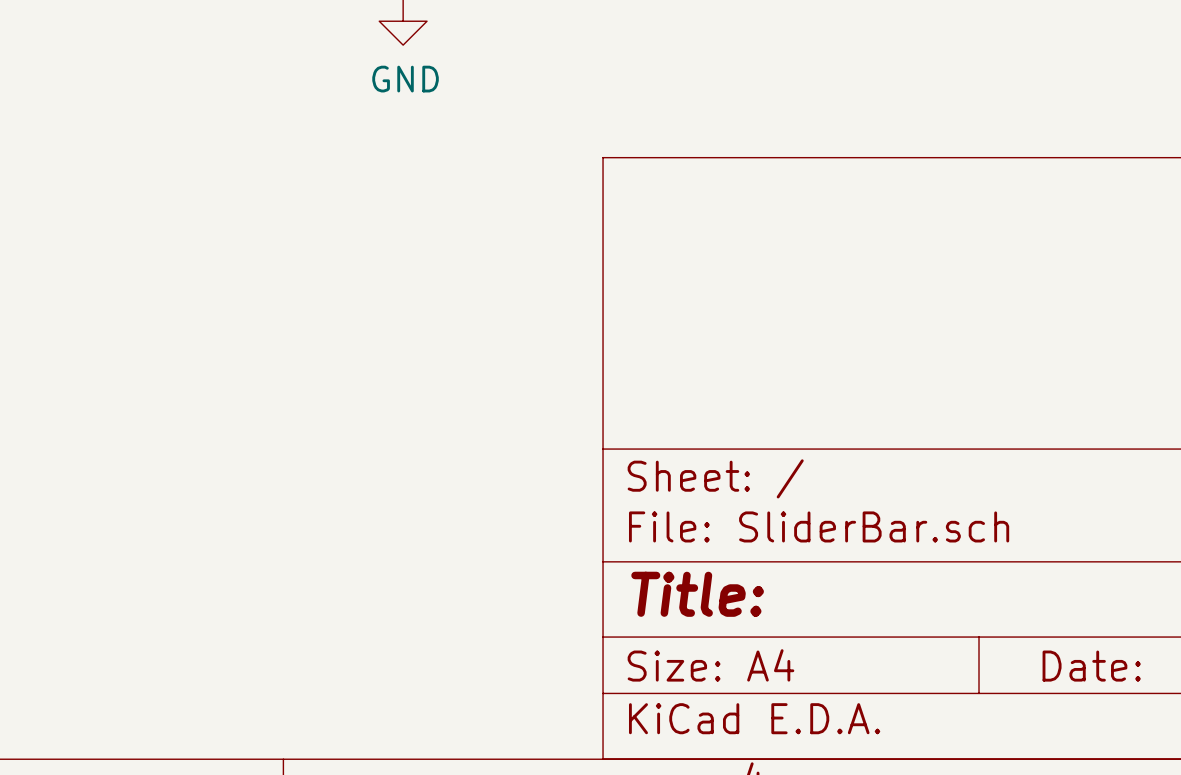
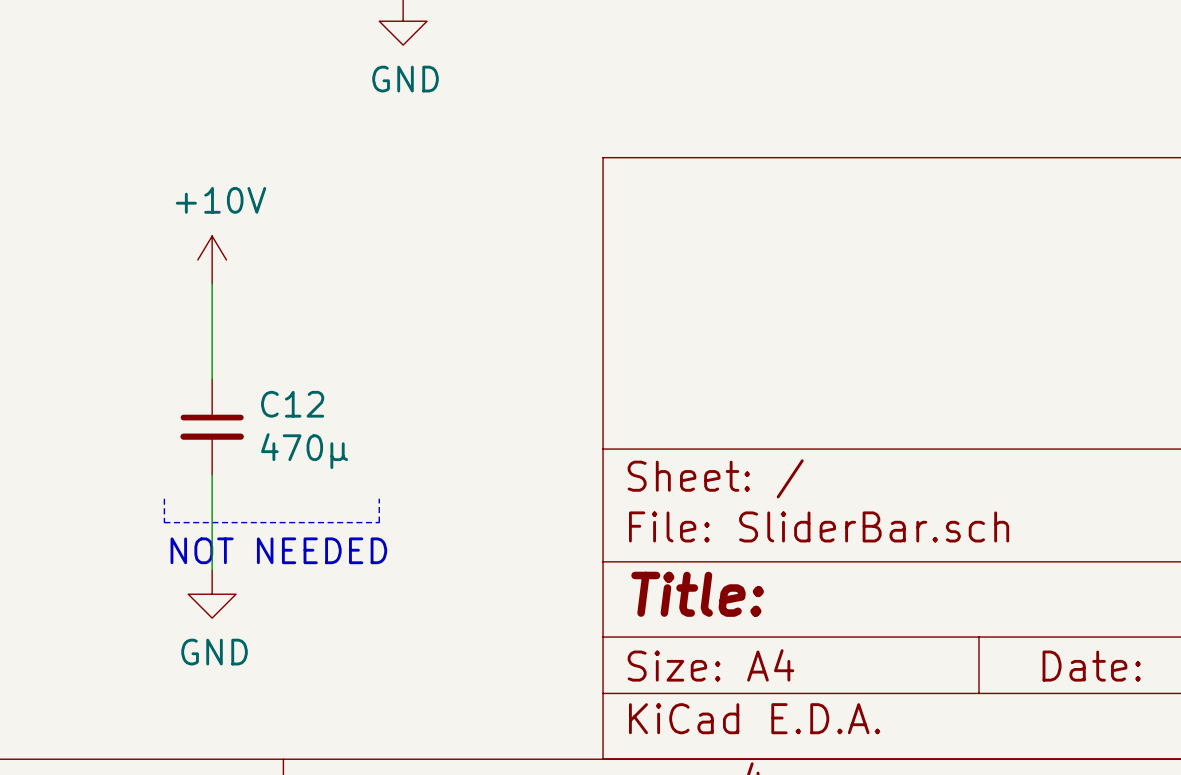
power symbol: none -> +10V (212, 259)
wire: none -> (212, 283) (212, 379)
C12: none -> 470µ (212, 427)
wire: none -> (212, 474) (212, 570)
line: none -> (164, 498) (164, 522) (379, 522) (379, 498)
text: none -> NOT NEEDED (278, 550)
power symbol: none -> GND (212, 594)

